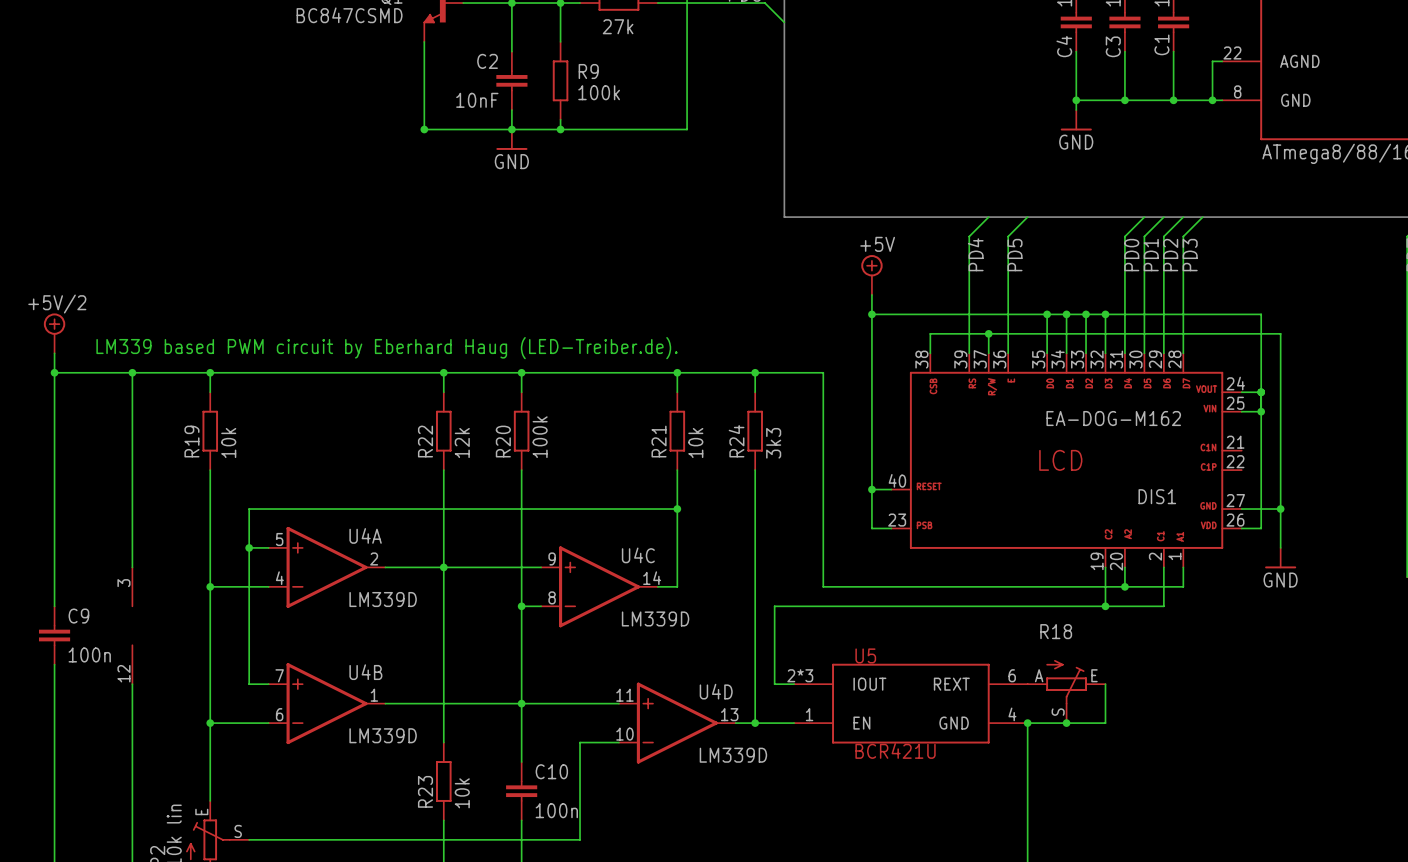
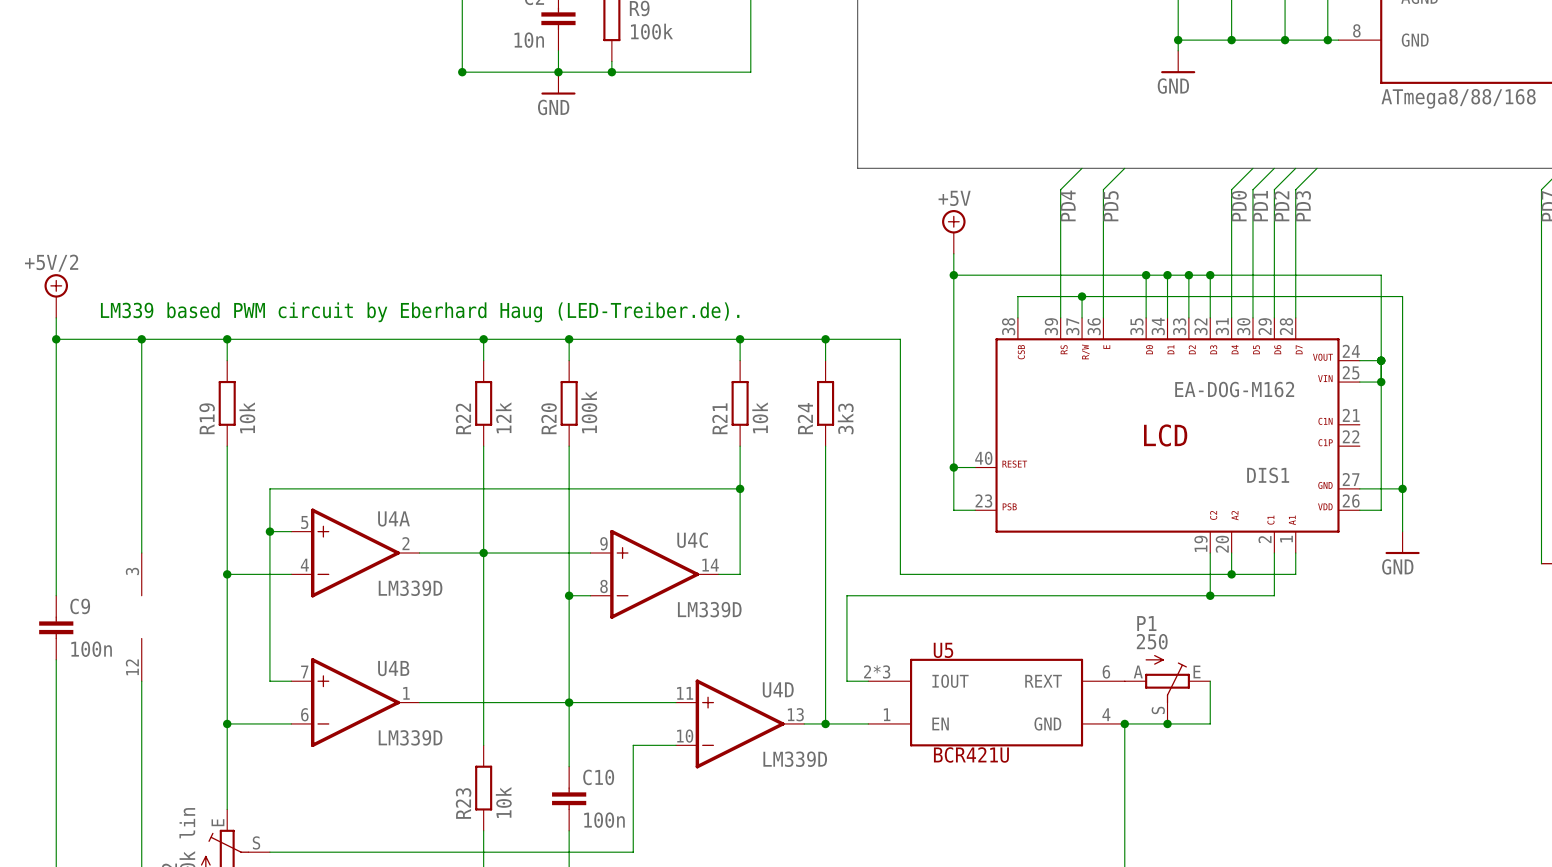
C2 value: 10nF (477, 100) -> 10n (529, 40)
R18 name: R18 (1056, 631) -> P1 (1146, 623)
R18 value: none -> 250 (1152, 641)

